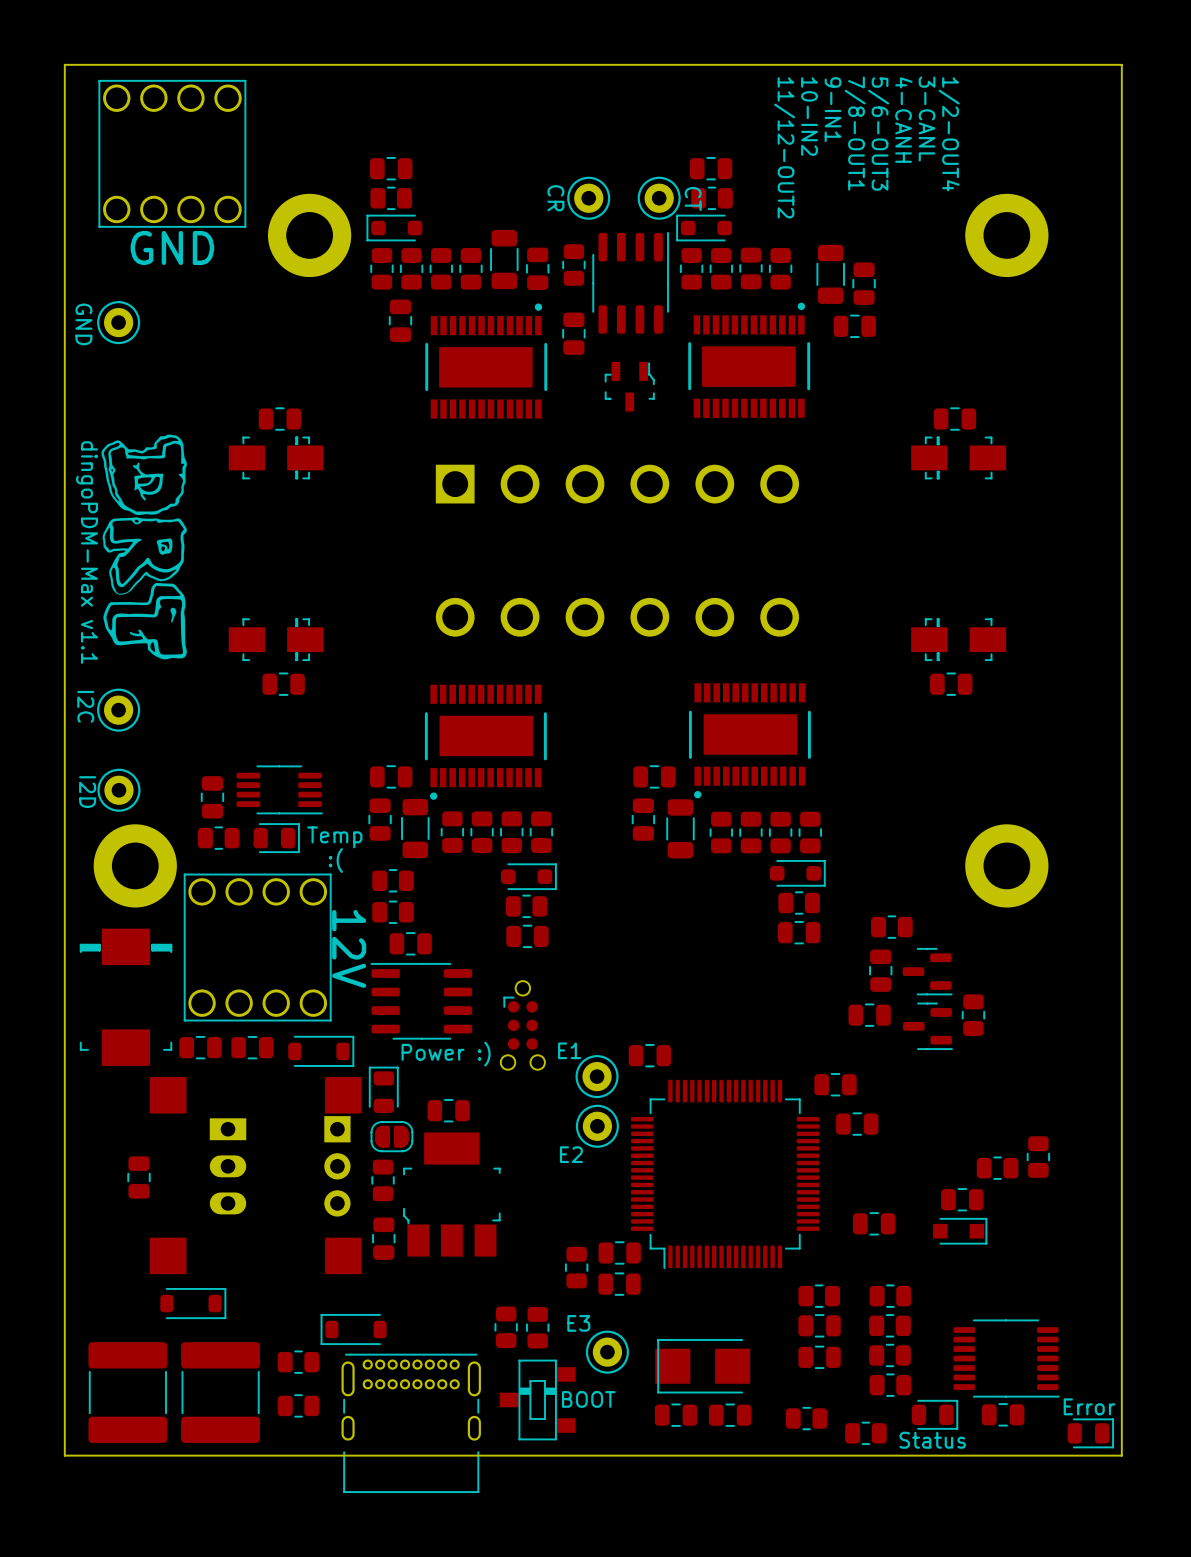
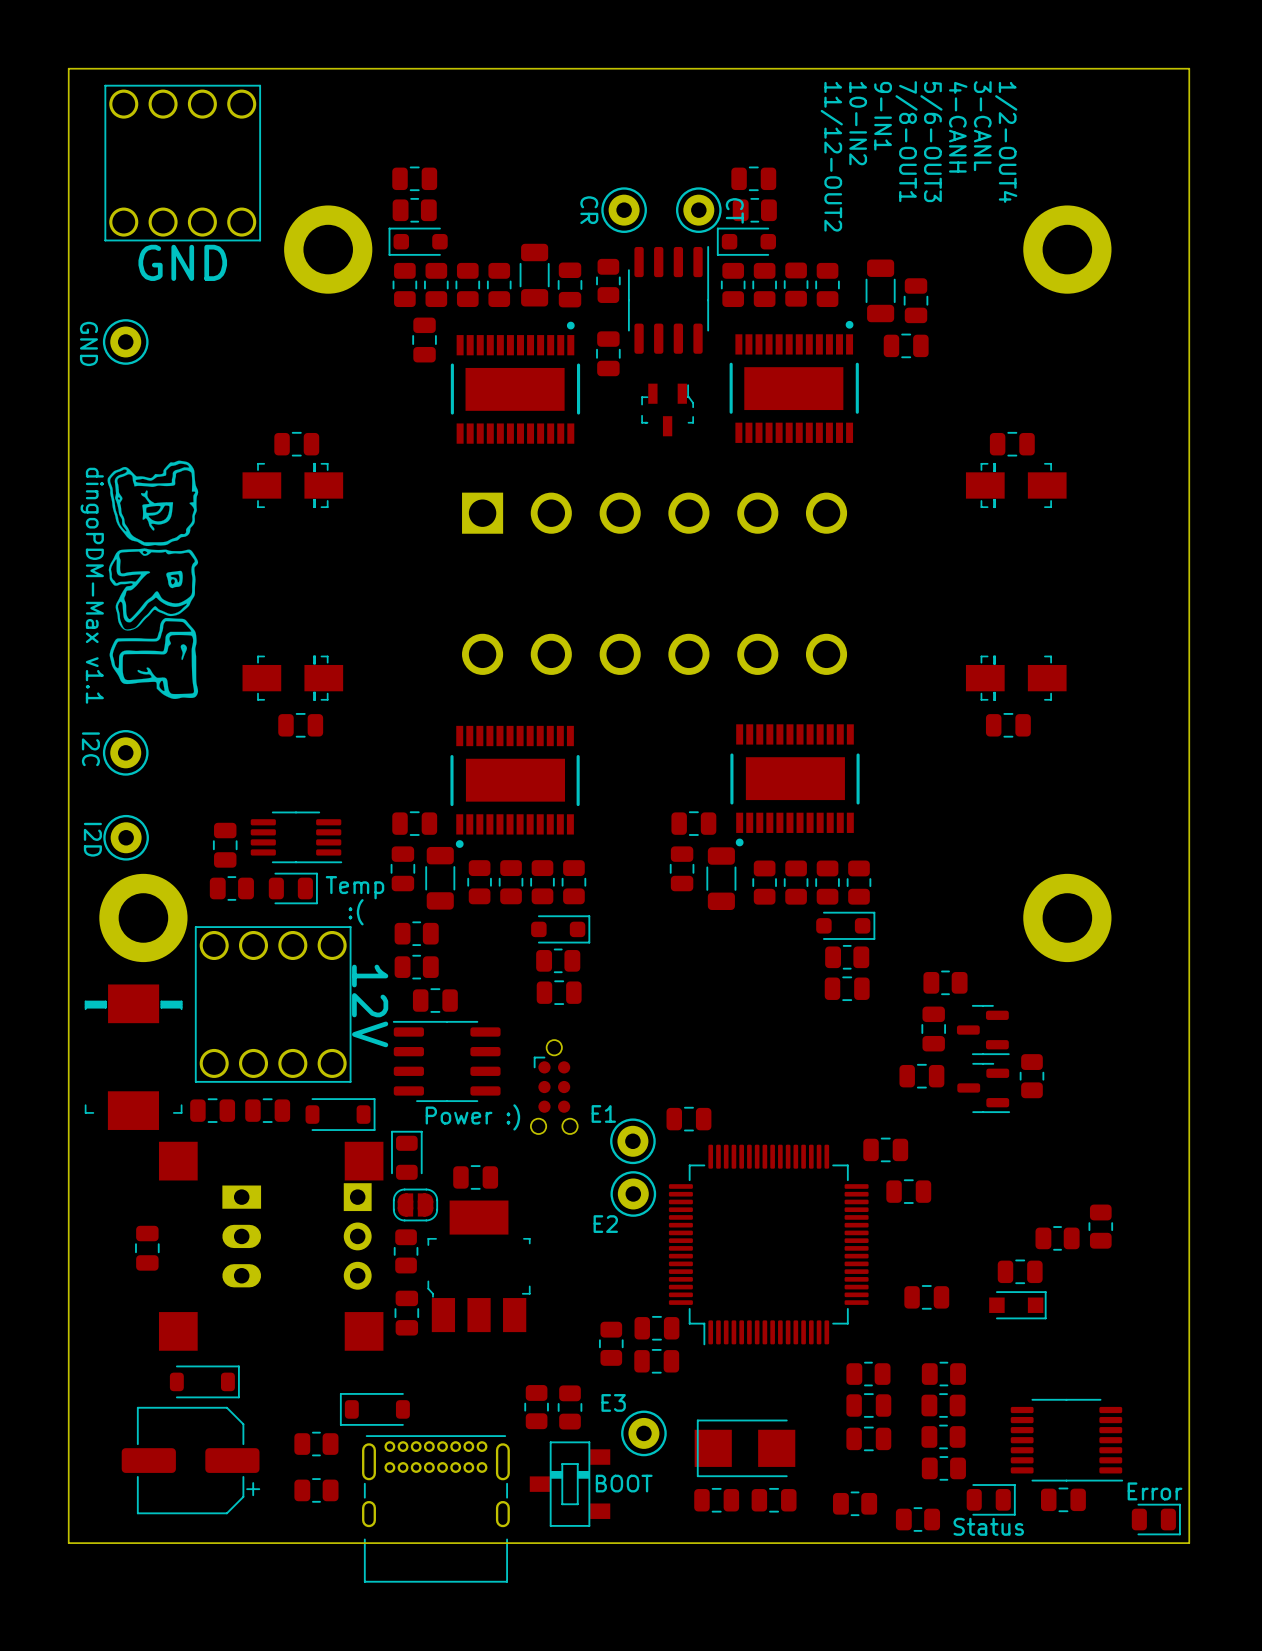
part: none -> (190, 1460)
part: (127, 1392) -> none
part: (220, 1392) -> none

